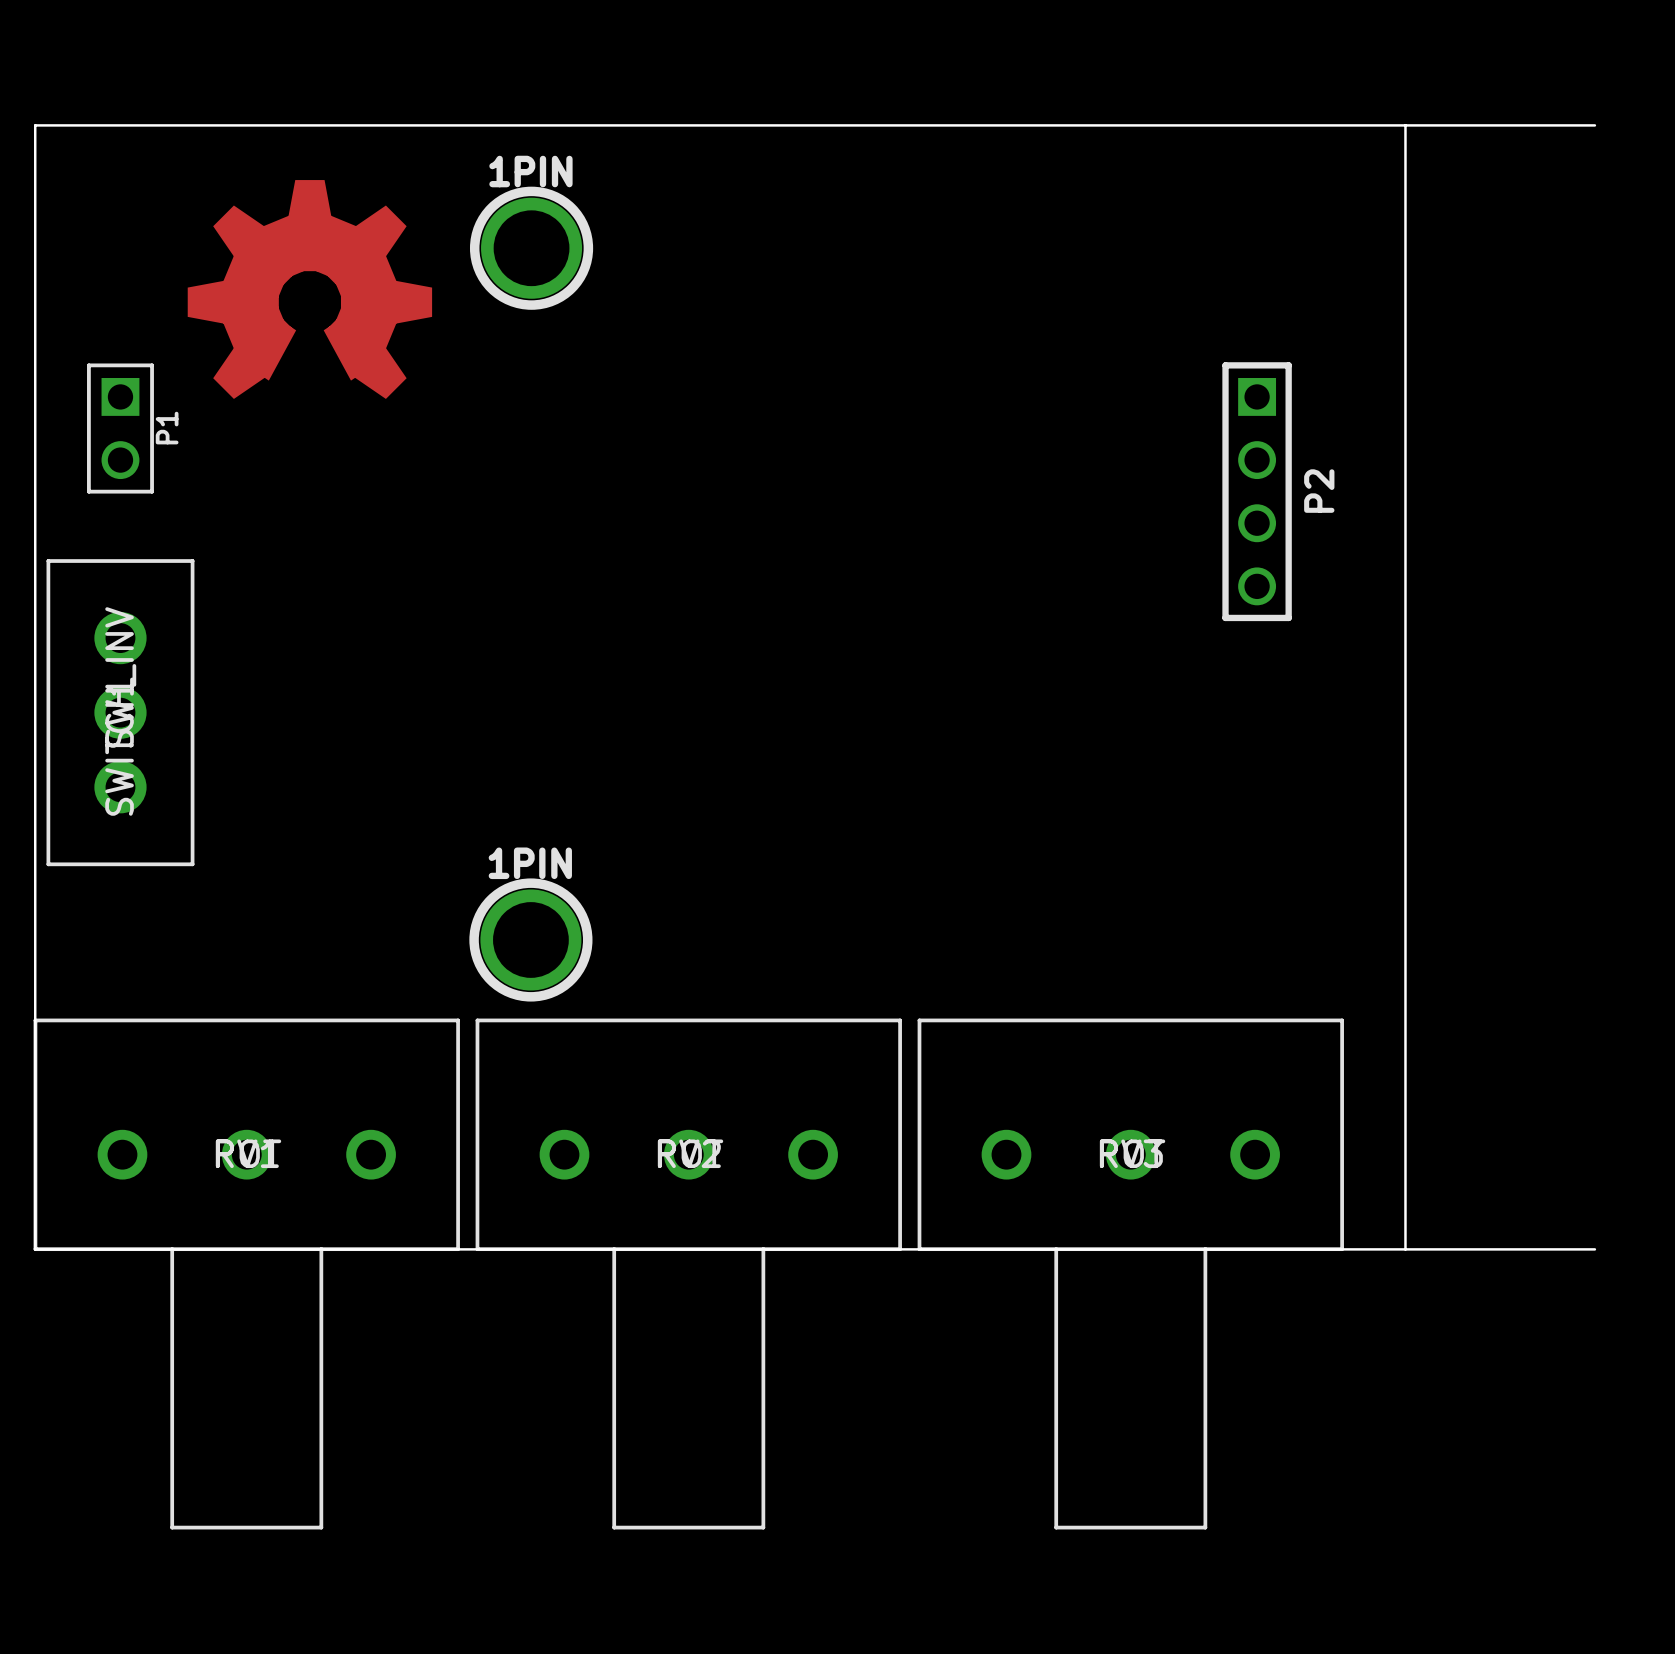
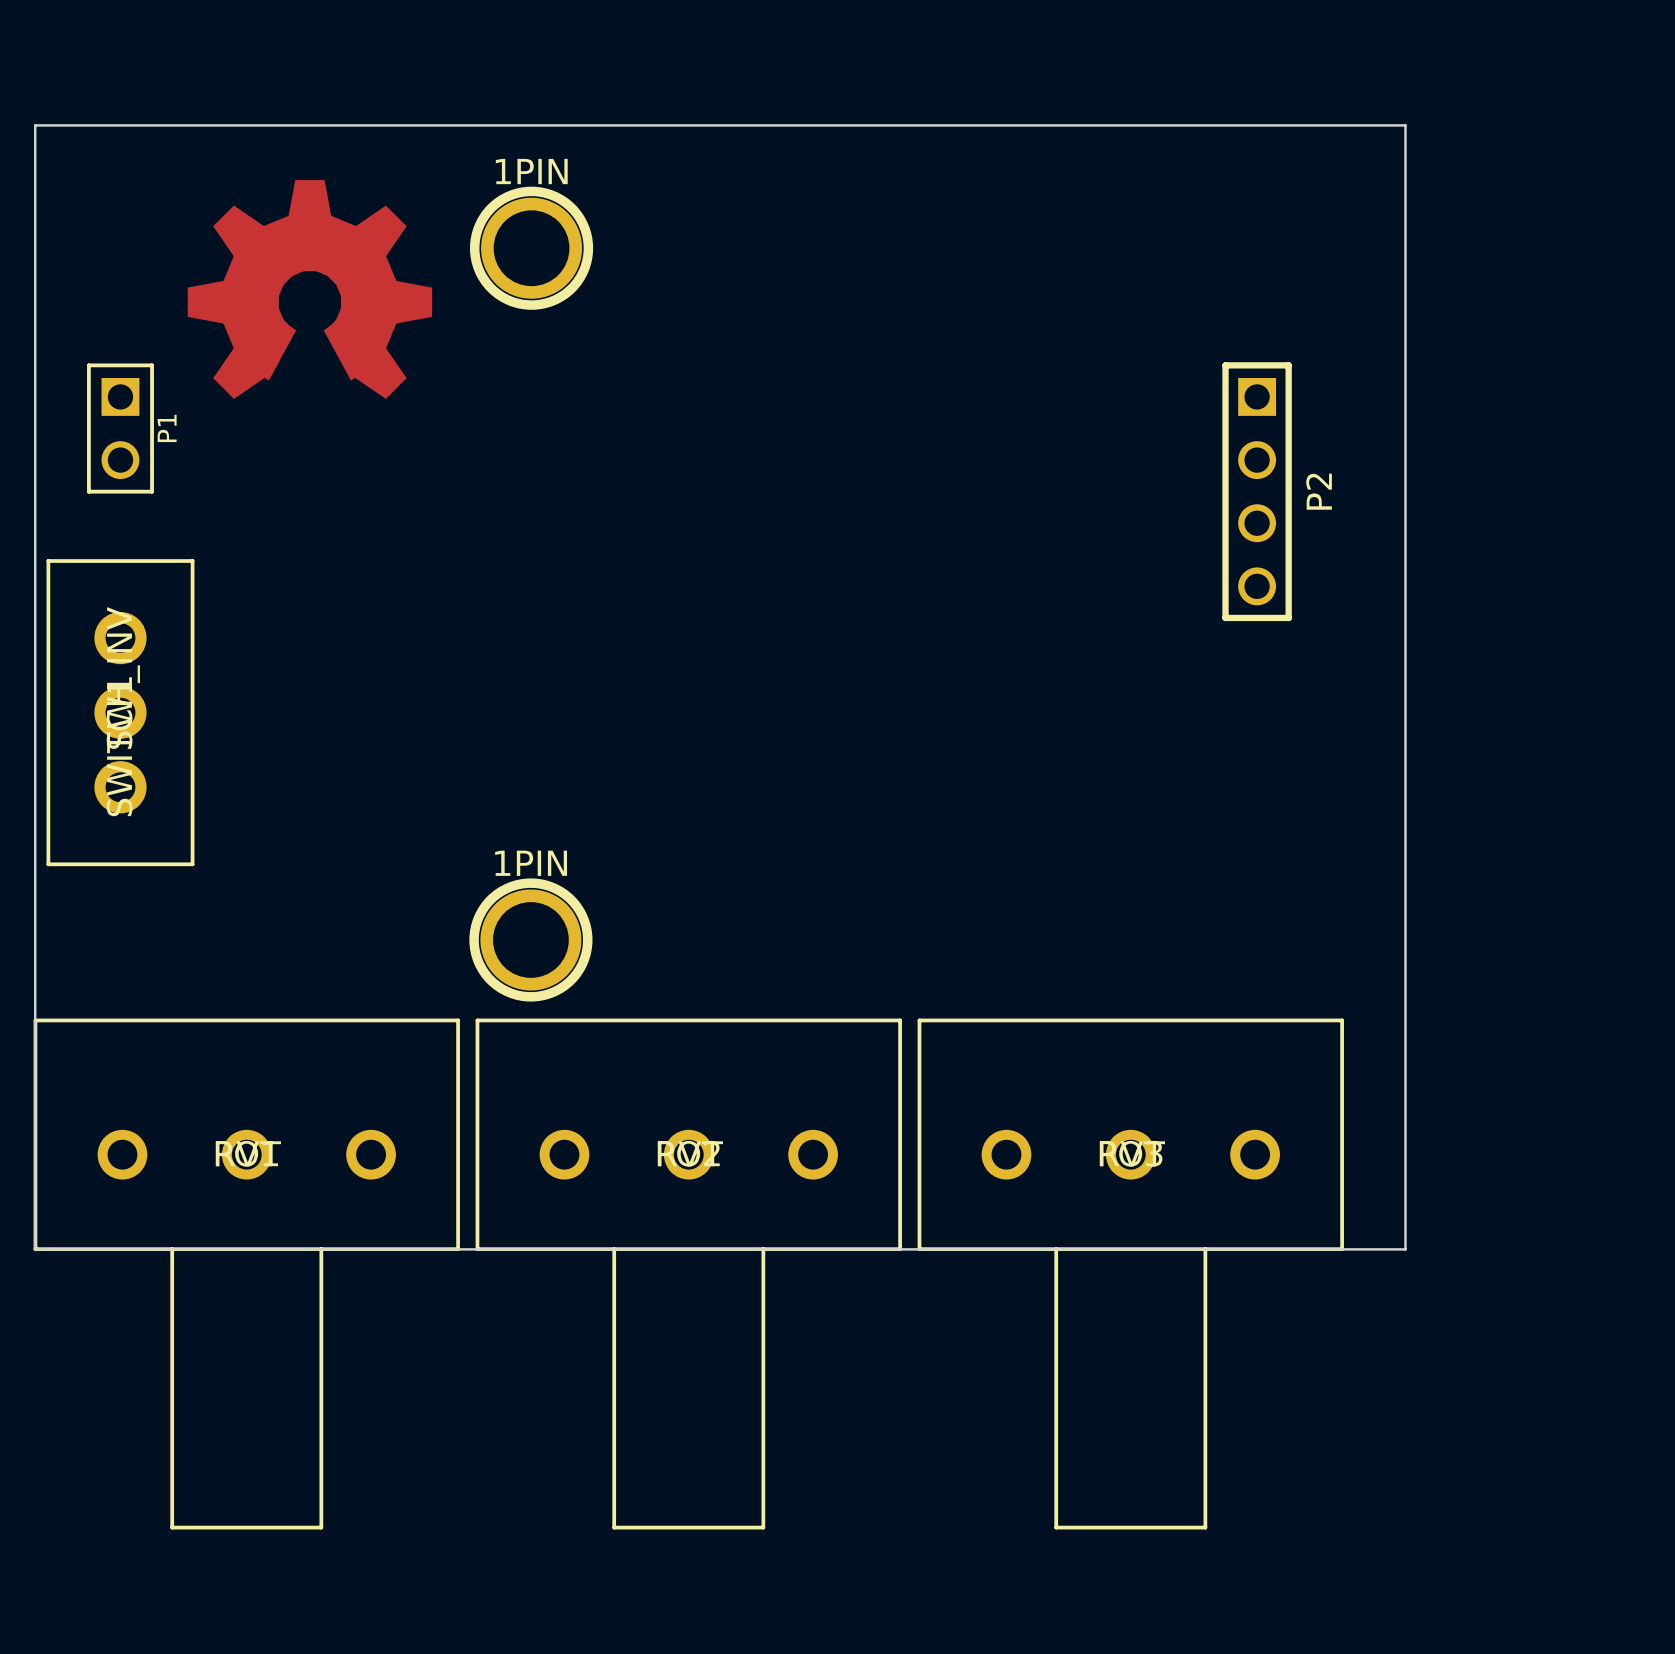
board edge: (1405, 125) (1594, 125) -> none
board edge: (1405, 1249) (1594, 1249) -> none

